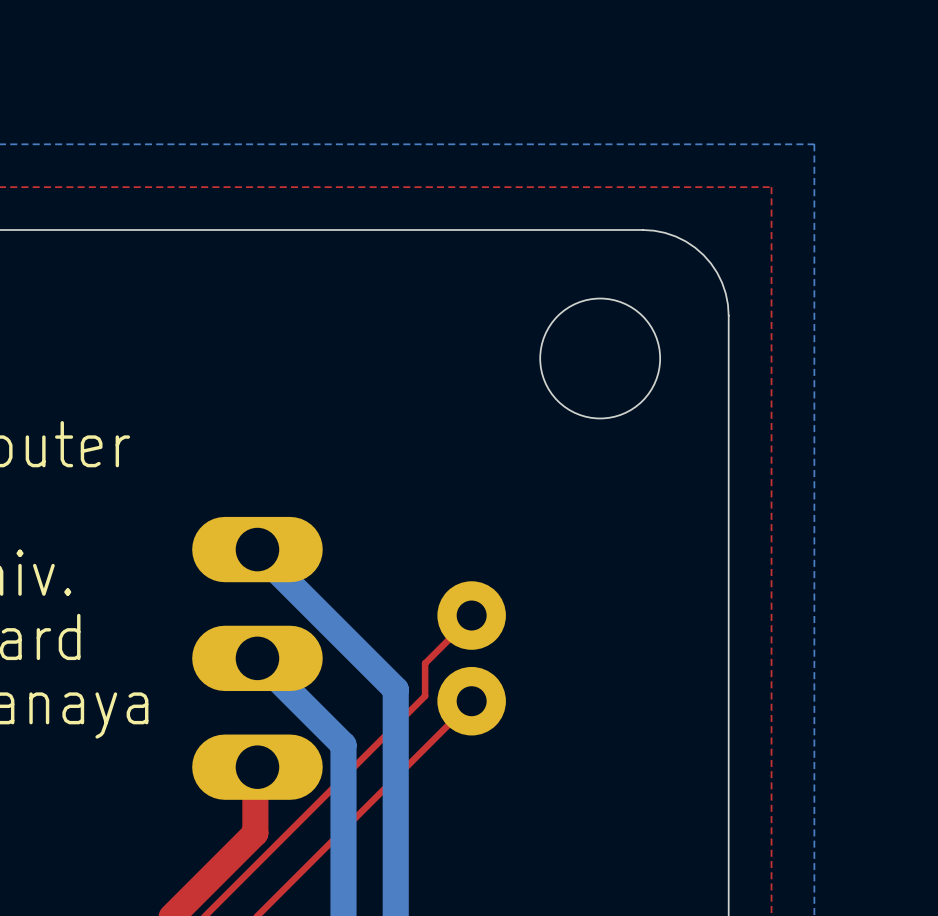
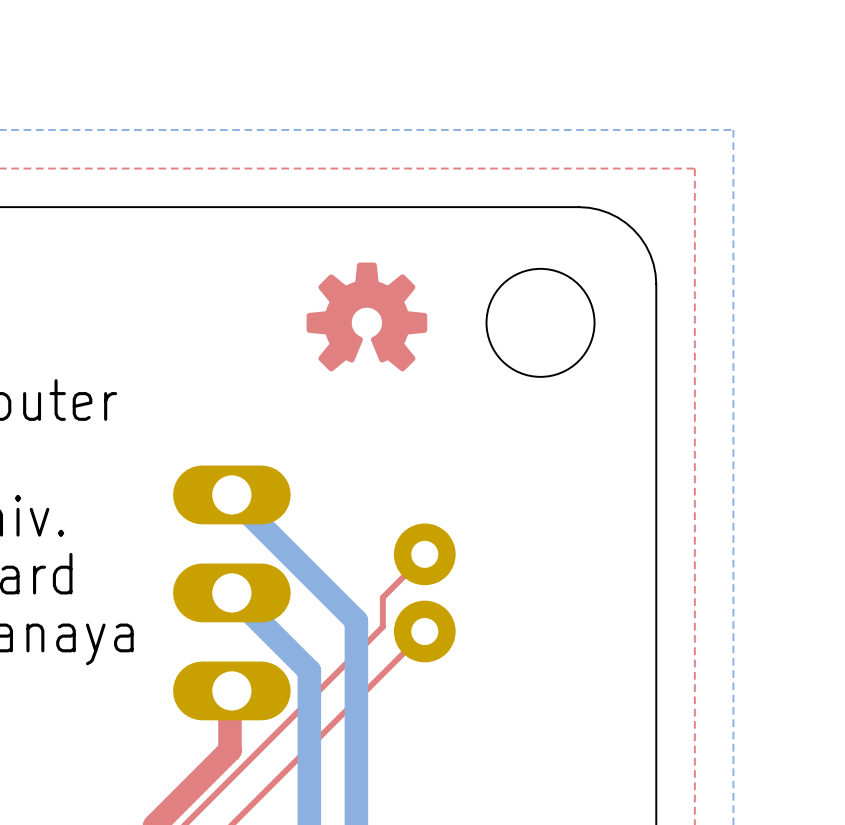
drawing: none -> [306, 262, 428, 372]

